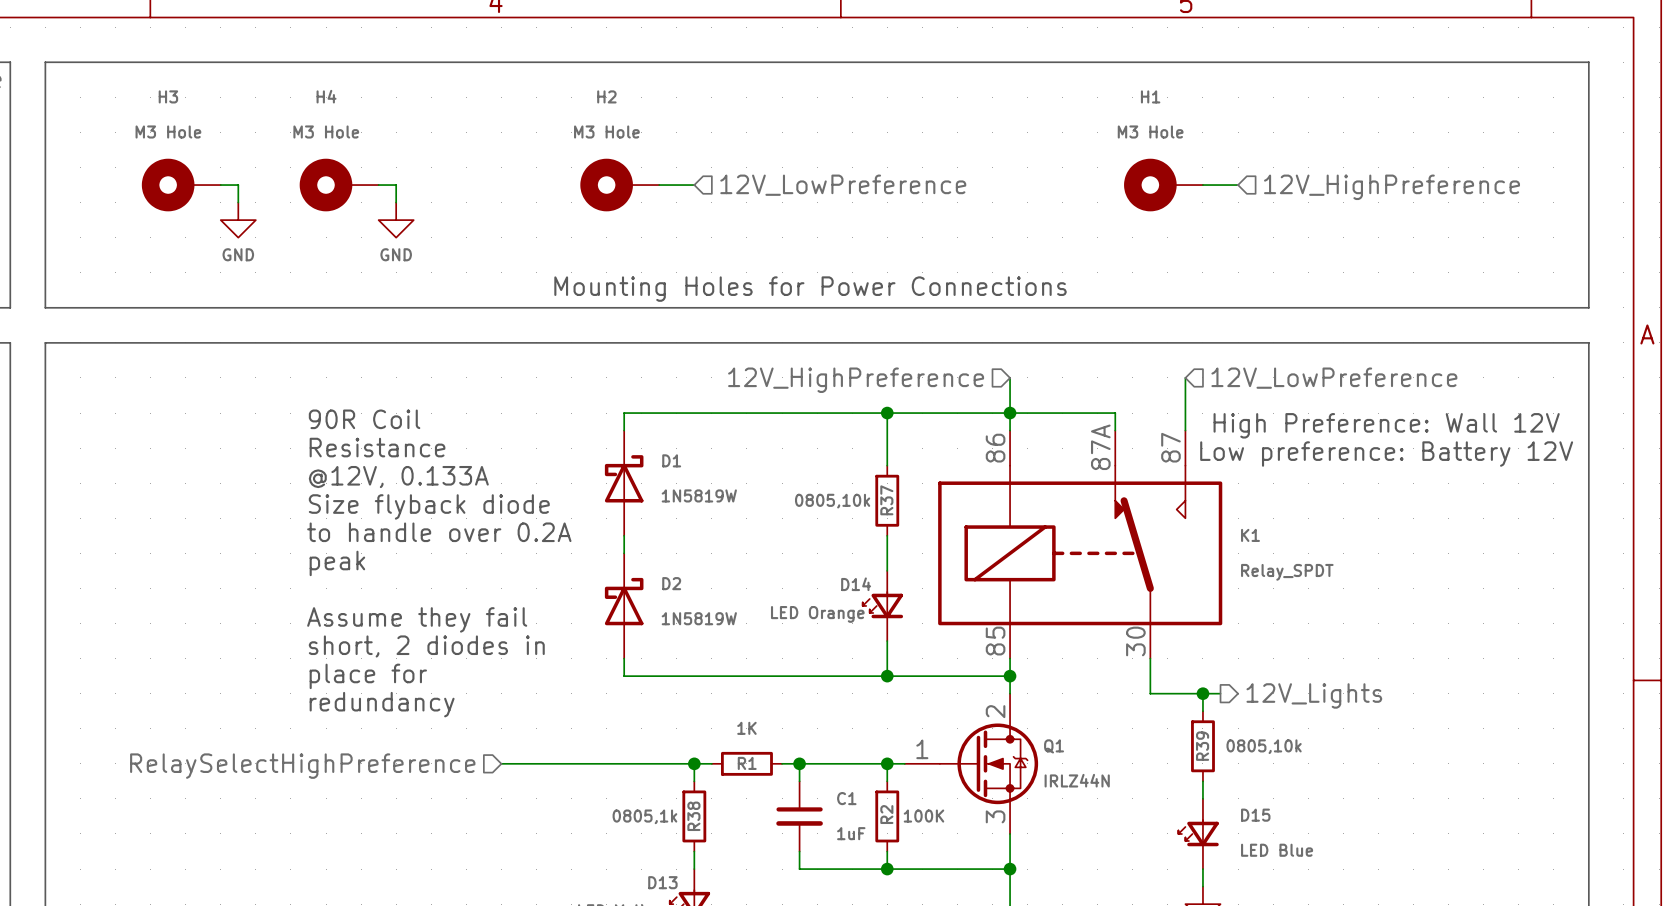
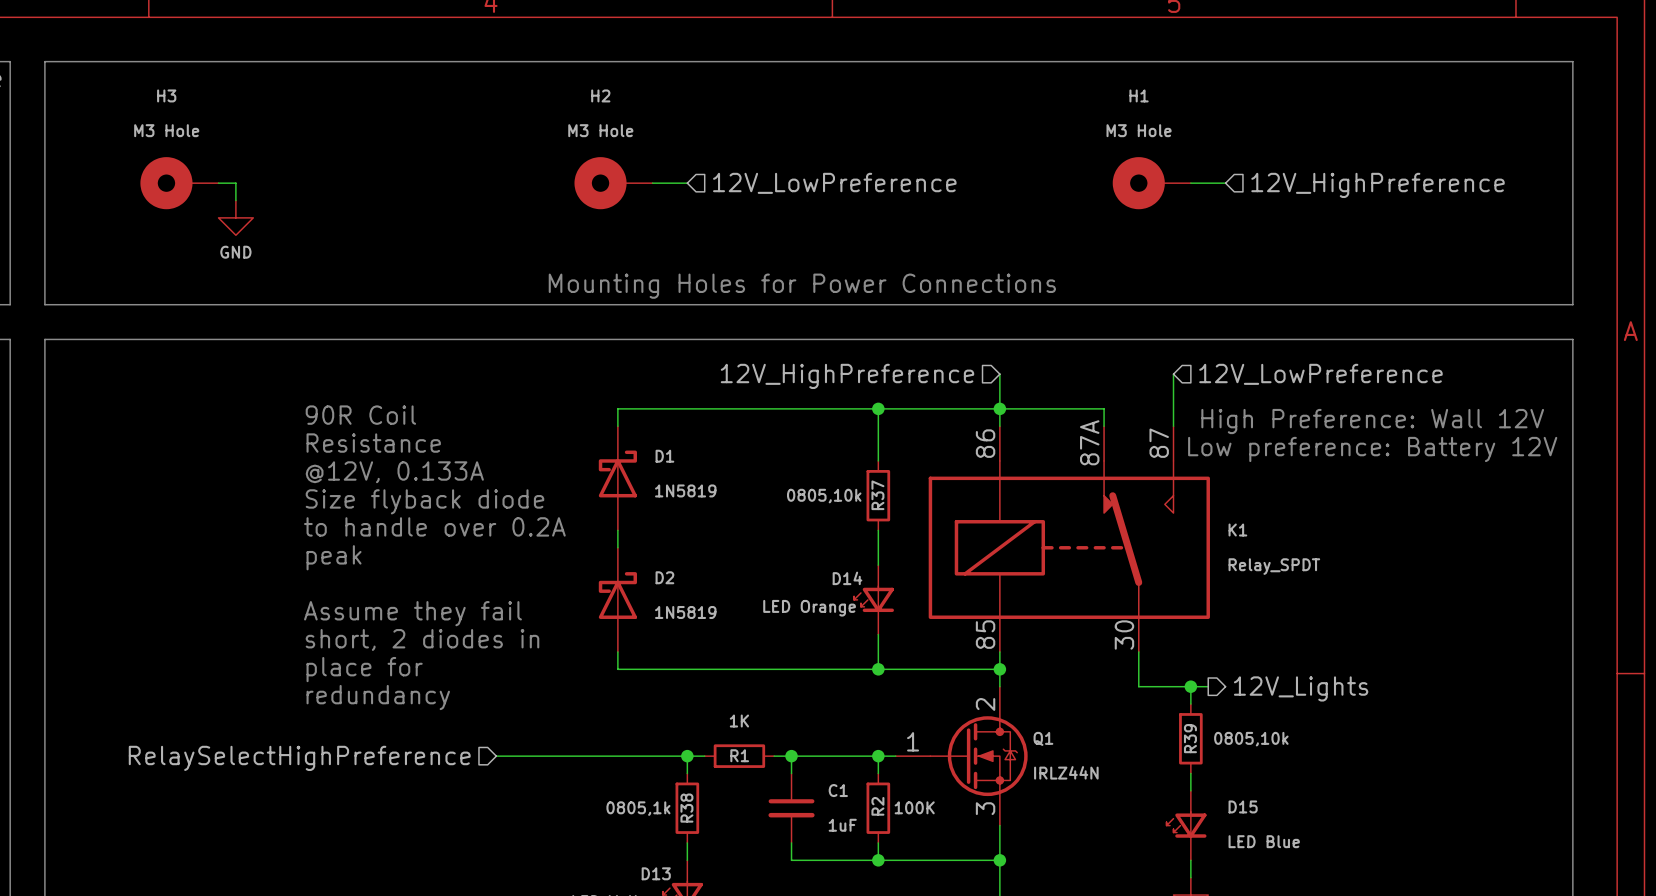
H4: M3 Hole (339, 185) -> none
wire: (378, 185) (396, 185) (396, 202) -> none
power symbol: GND (396, 220) -> none
D1 value: 1N5819W (699, 495) -> 1N5819 (685, 490)
D2 value: 1N5819W (699, 618) -> 1N5819 (685, 612)

